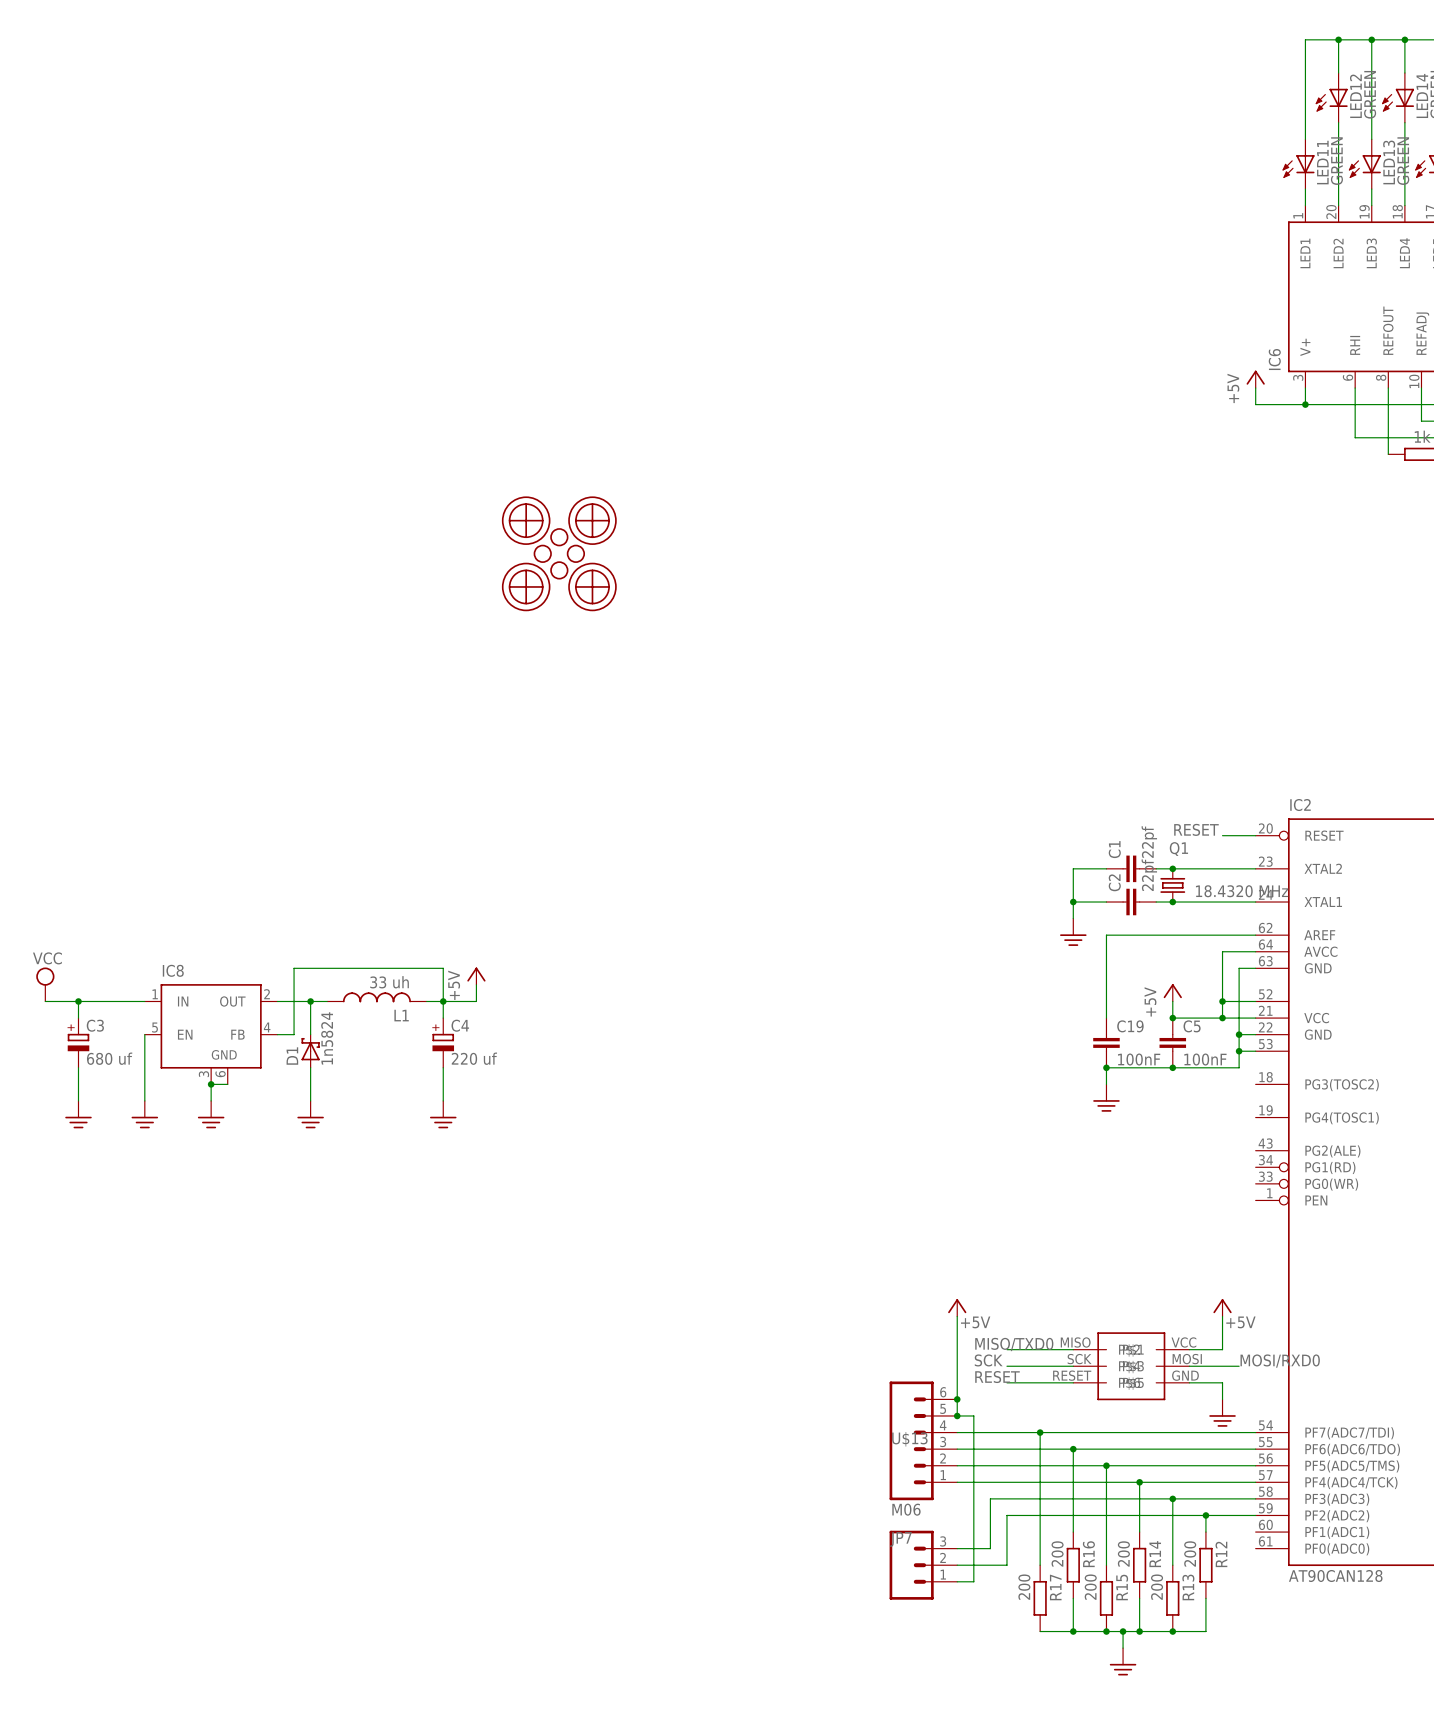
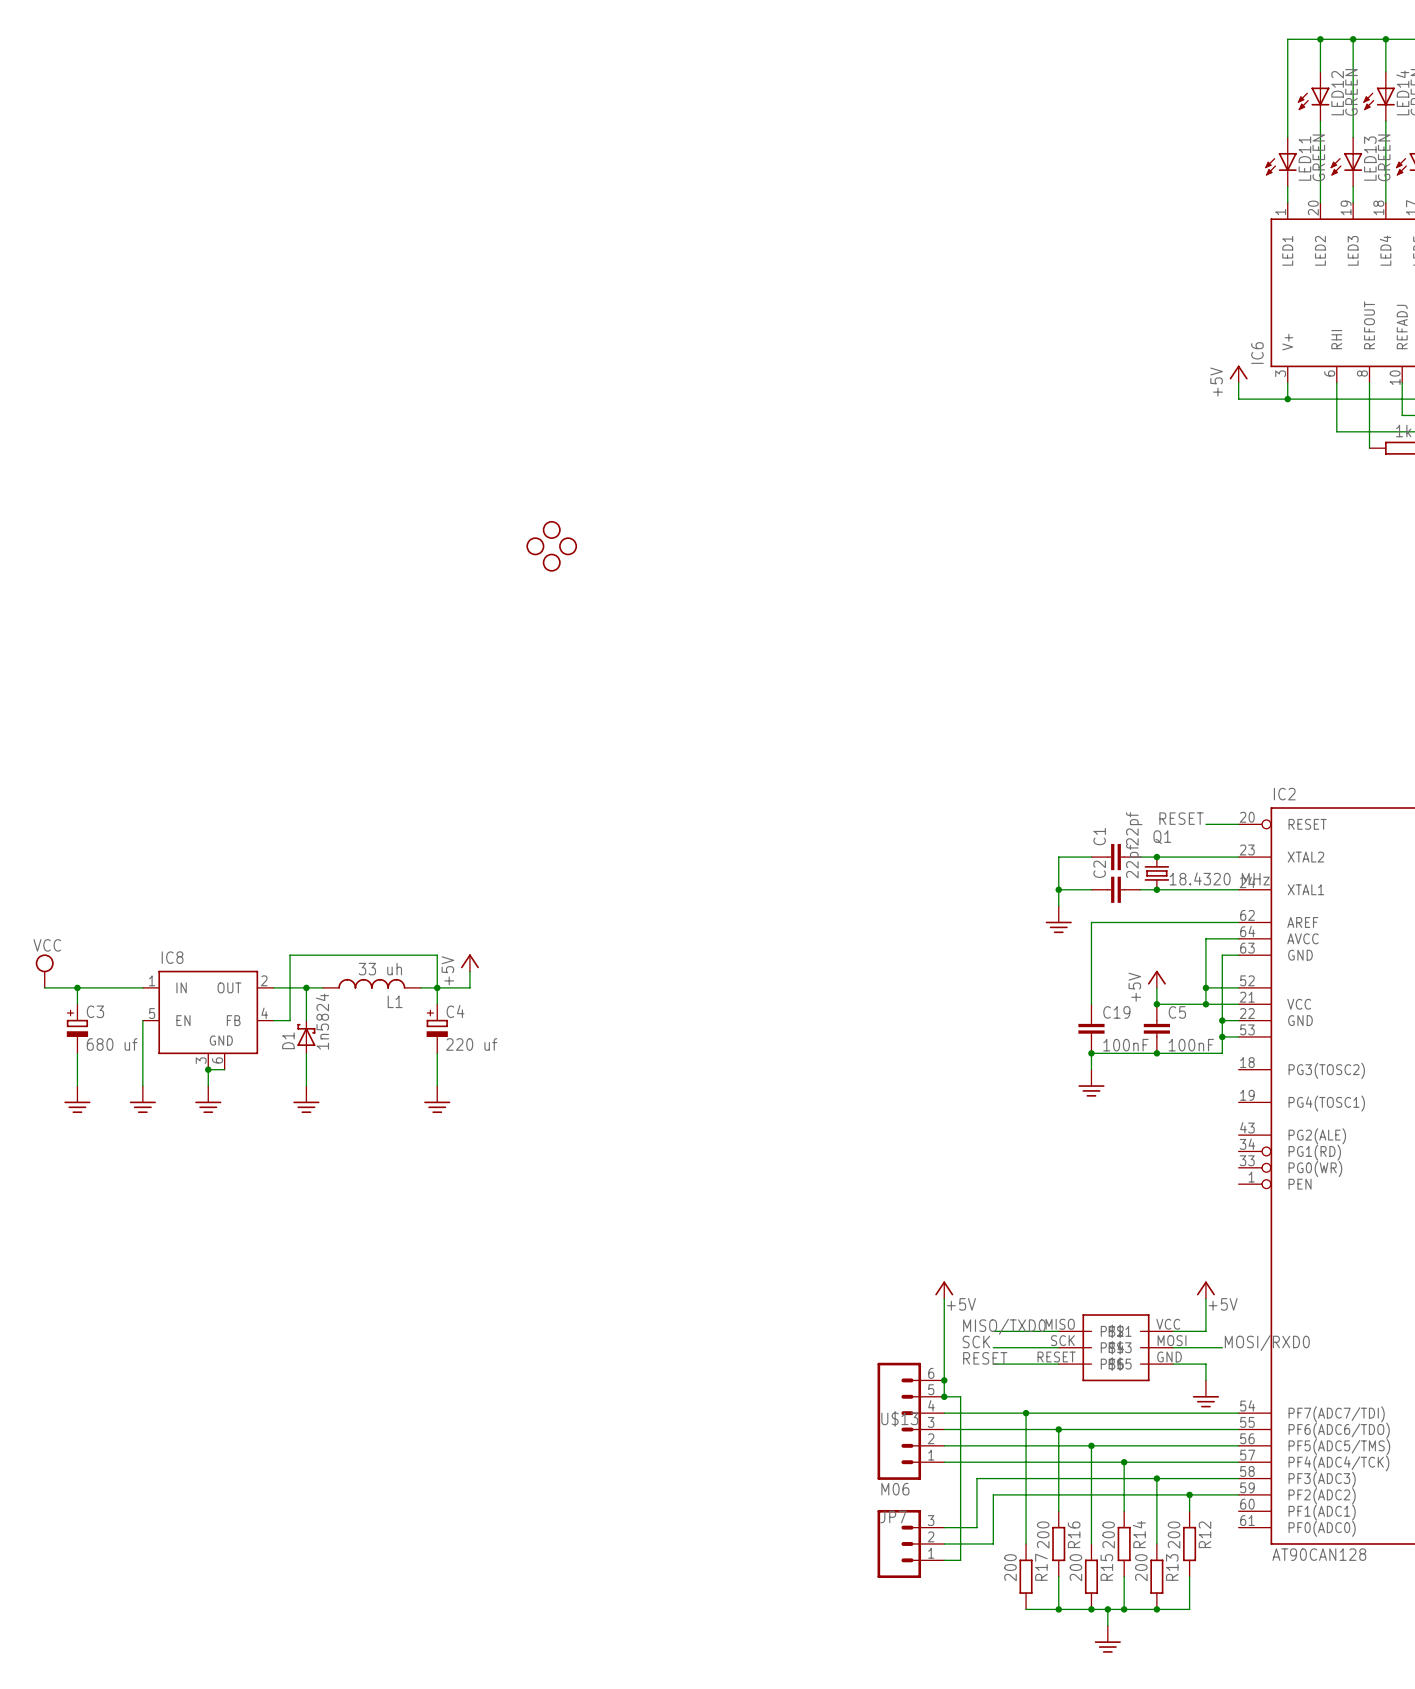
part: (526, 520) -> none
part: (592, 520) -> none
part: (526, 586) -> none
part: (592, 586) -> none

